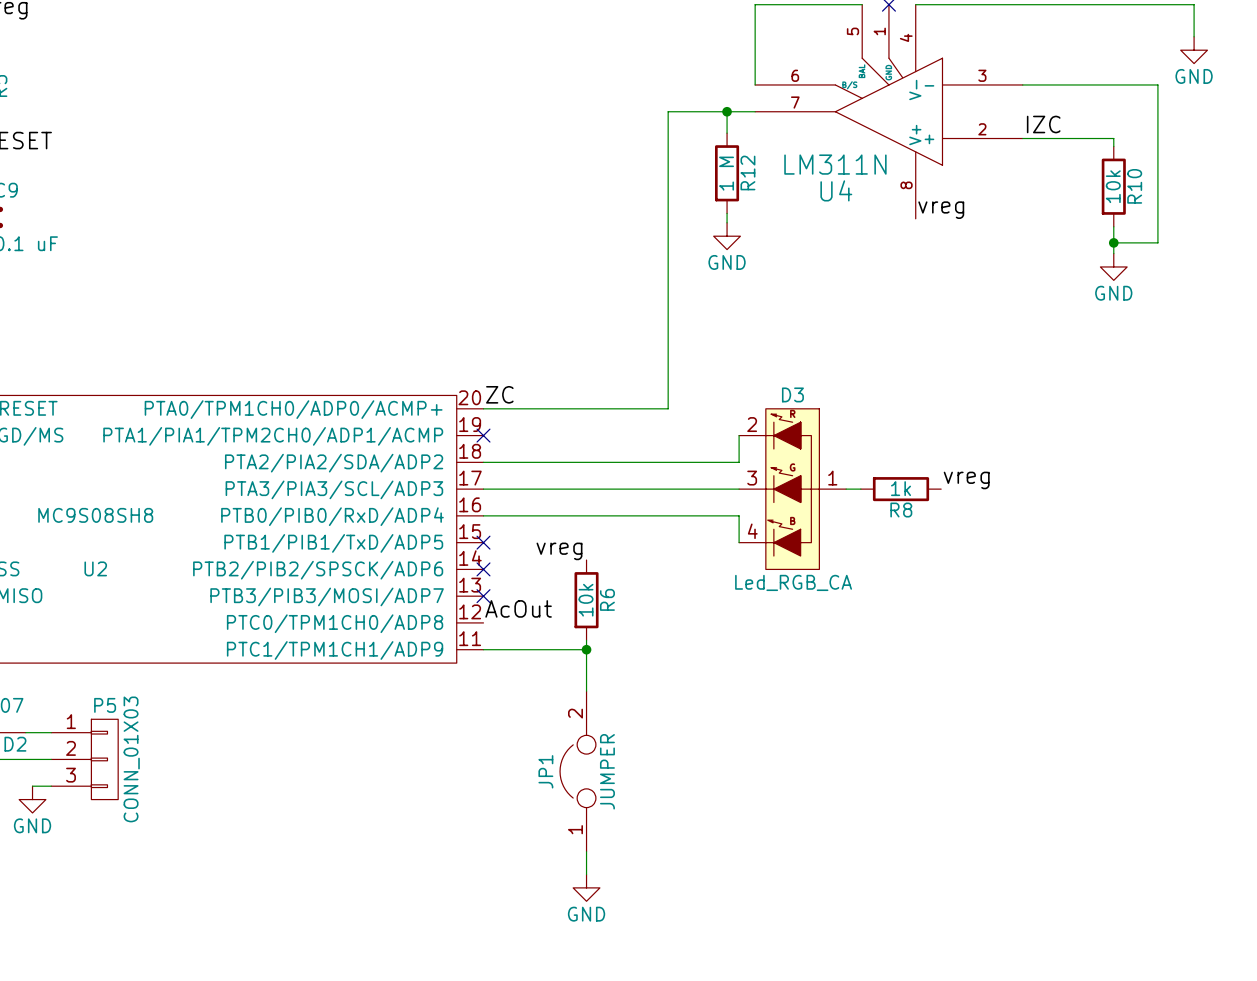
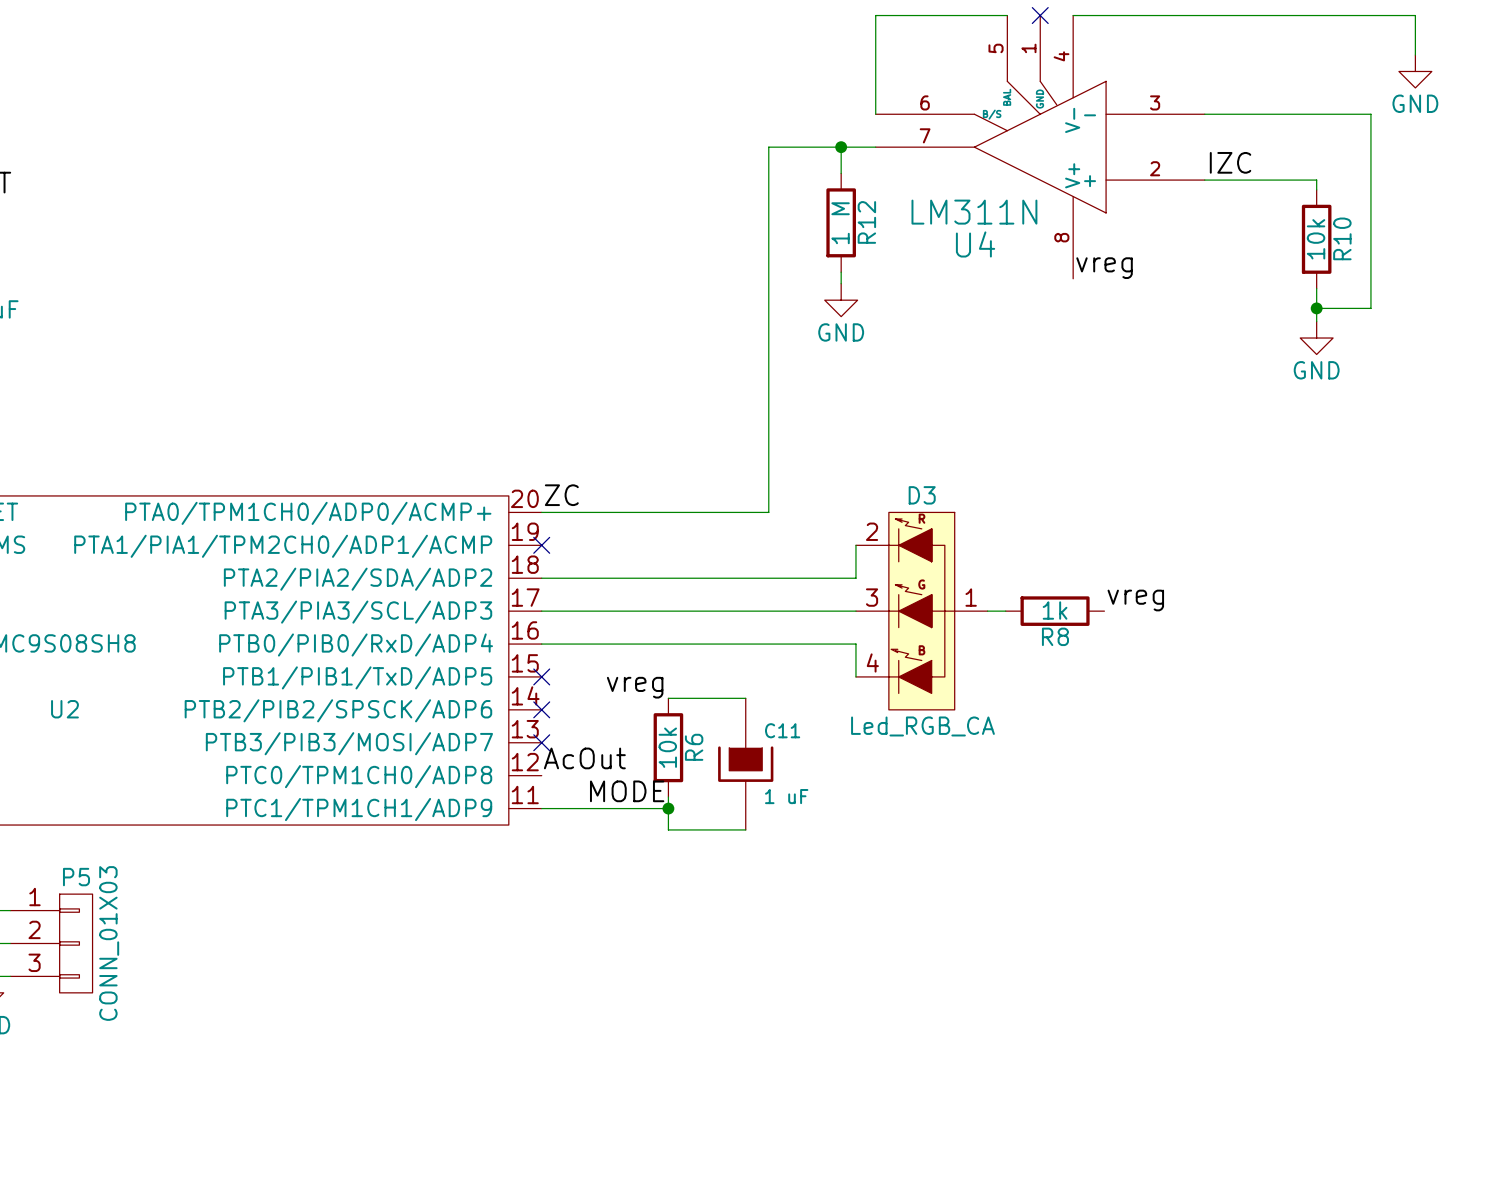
wire: none -> (668, 698) (745, 698)
C11: none -> 1 uF (745, 764)
label: none -> MODE (627, 791)
wire: (586, 667) (586, 691) -> (668, 829) (745, 829)
JP1: JUMPER (577, 771) -> none
wire: (586, 851) (586, 874) -> none
power symbol: GND (586, 887) -> none

